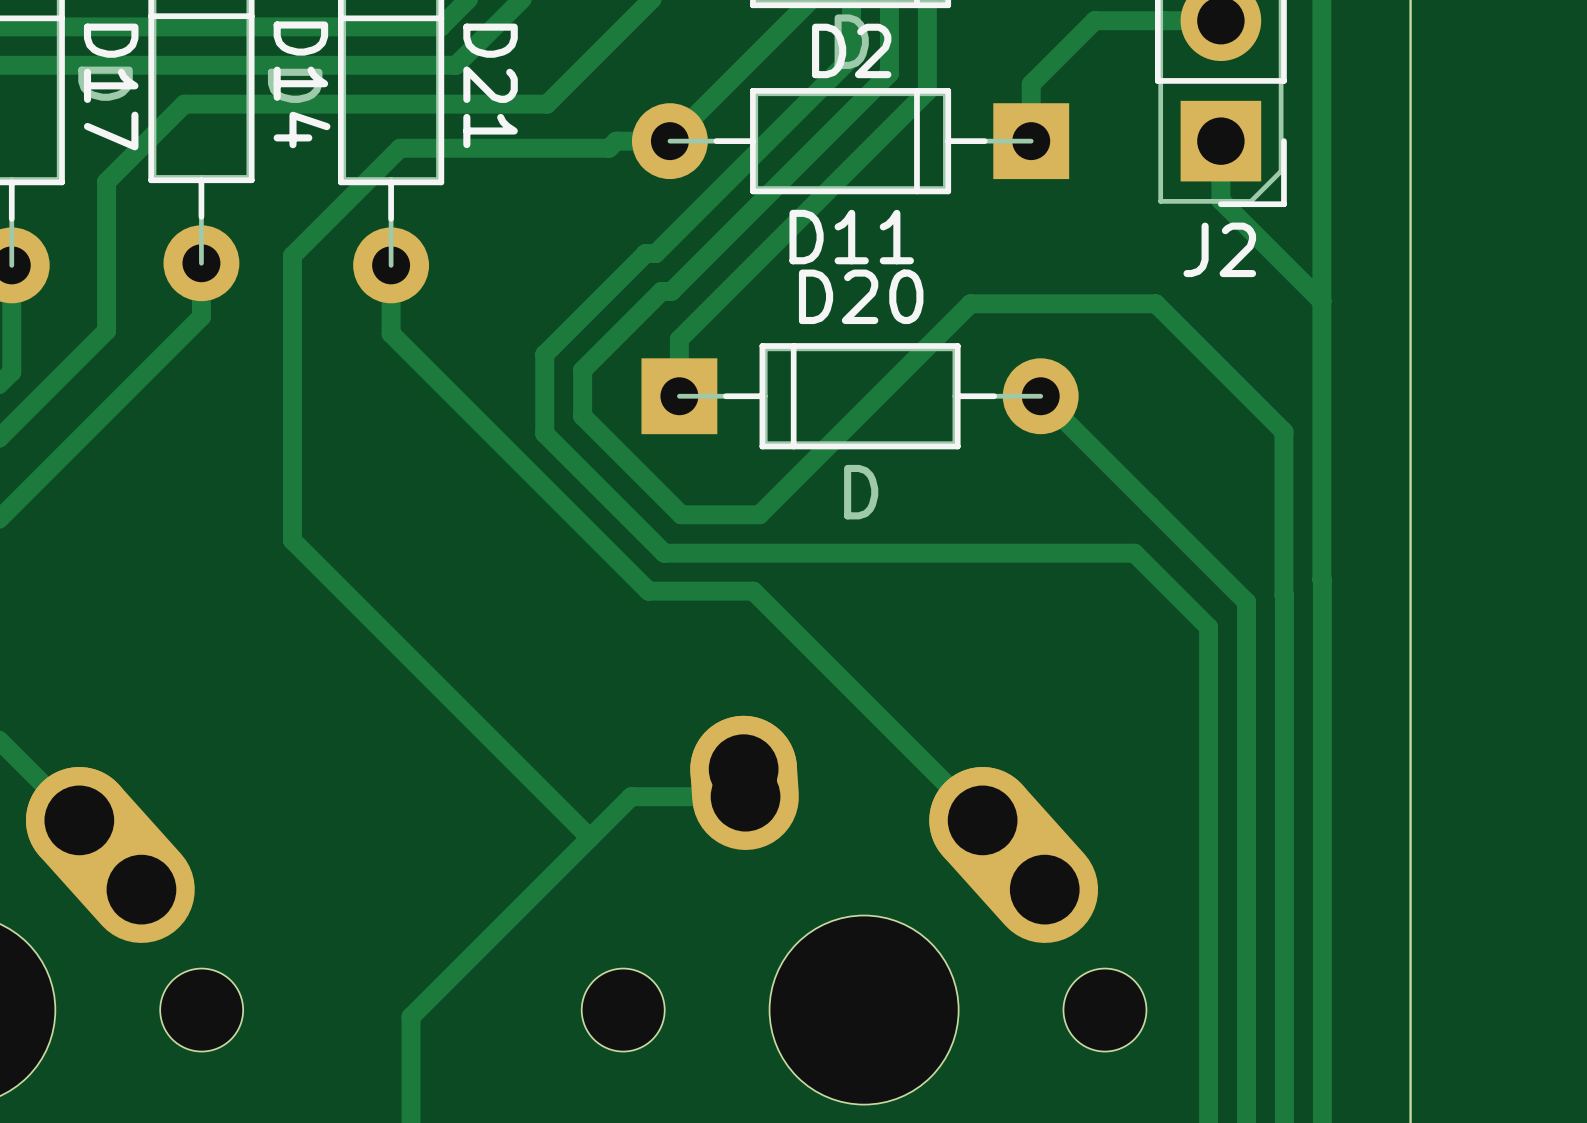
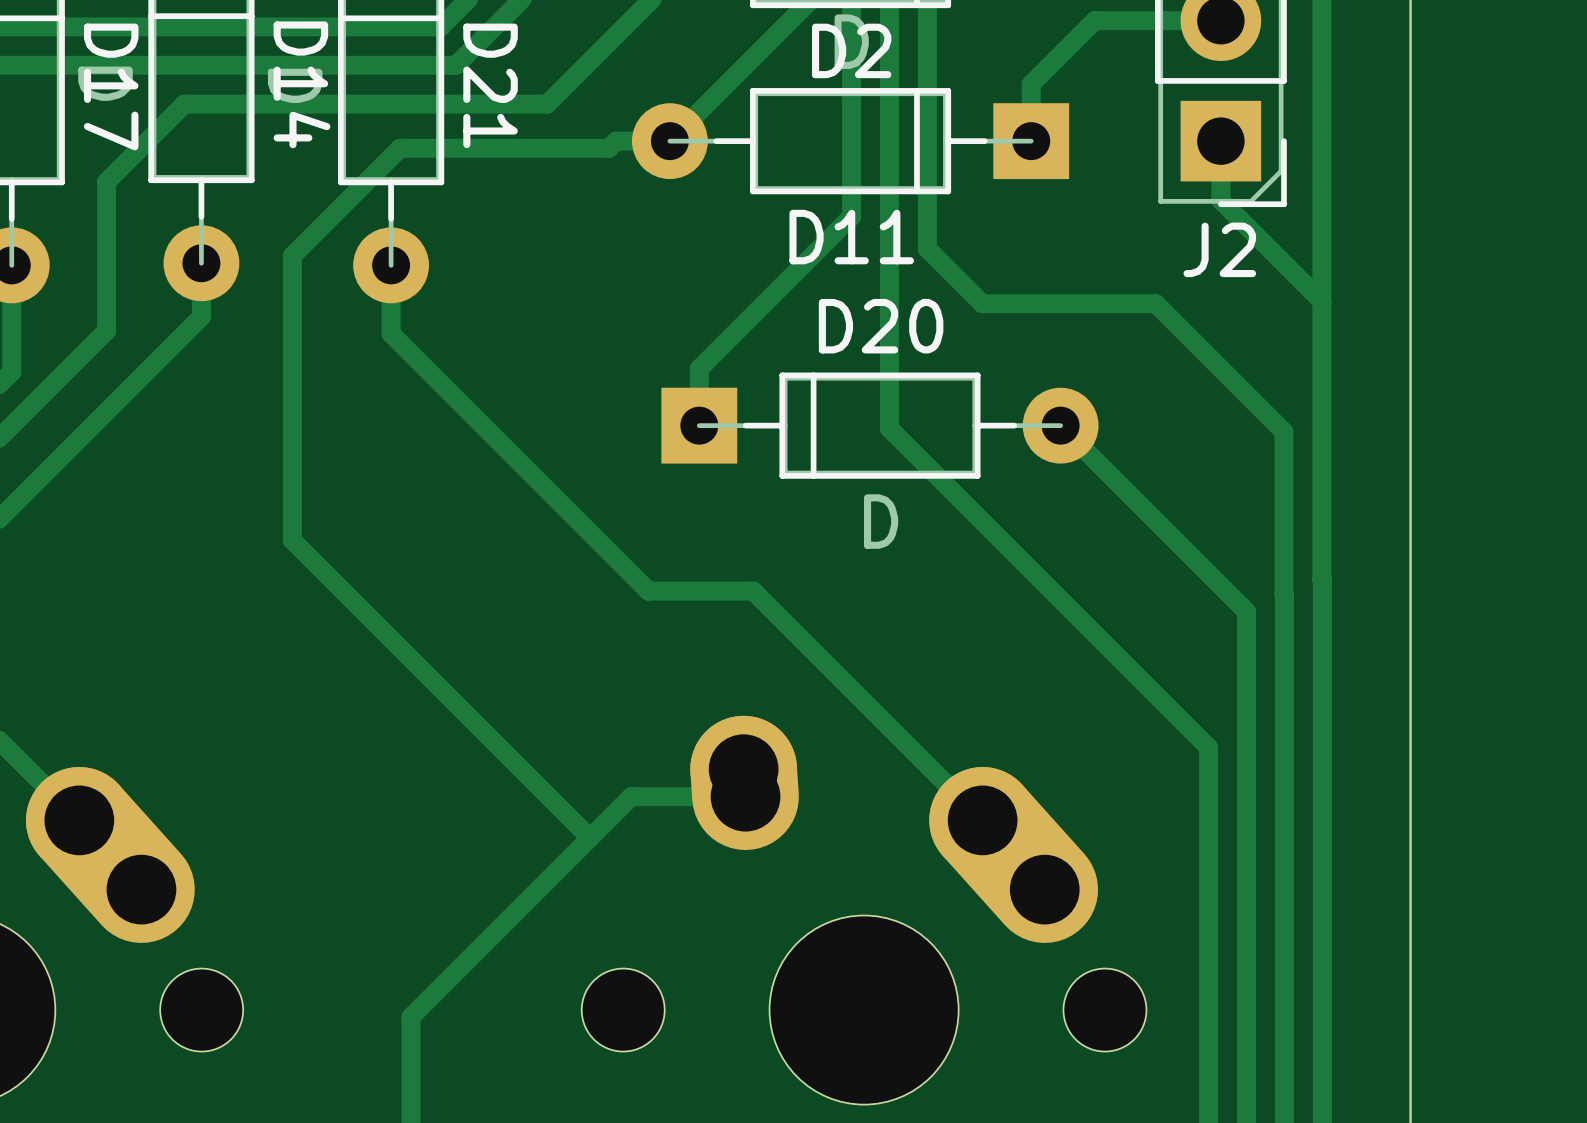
track: (851, 57) (655, 253) (645, 253) (544, 354) (544, 433) (664, 553) (1134, 553) (1208, 627) (1208, 747) -> (889, 73) (889, 428) (1208, 747)
track: none -> (851, 57) (851, 216) (699, 368) (699, 425)
track: (889, 73) (671, 291) (661, 291) (582, 370) (582, 416) (681, 514) (759, 514) (970, 303) (982, 303) -> (927, 91) (927, 248) (982, 303)
track: (927, 91) (679, 339) (679, 396) -> none
D20 position: (860, 396) -> (879, 425)
track: (1040, 396) (1246, 602) (1246, 611) -> (1060, 425) (1246, 611)

